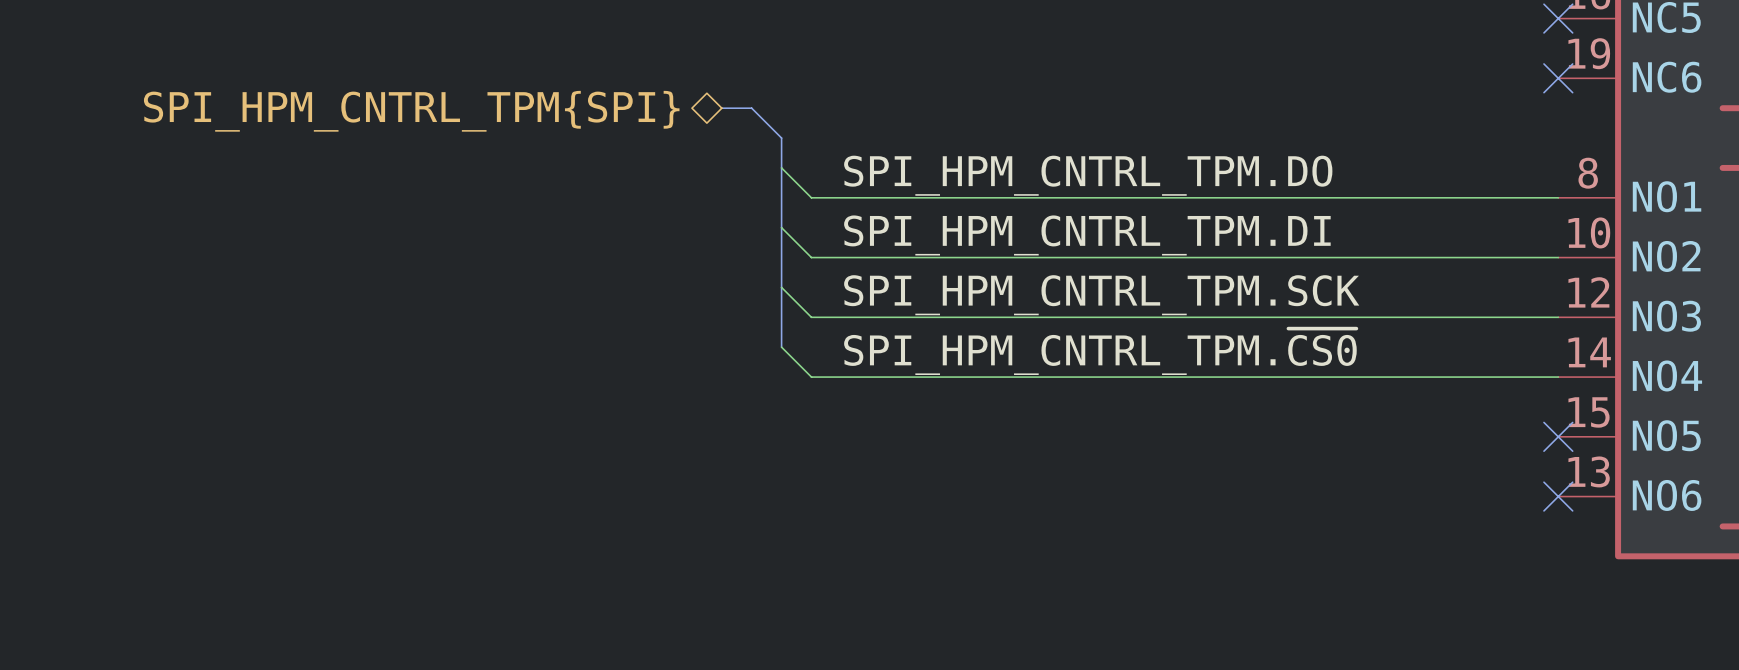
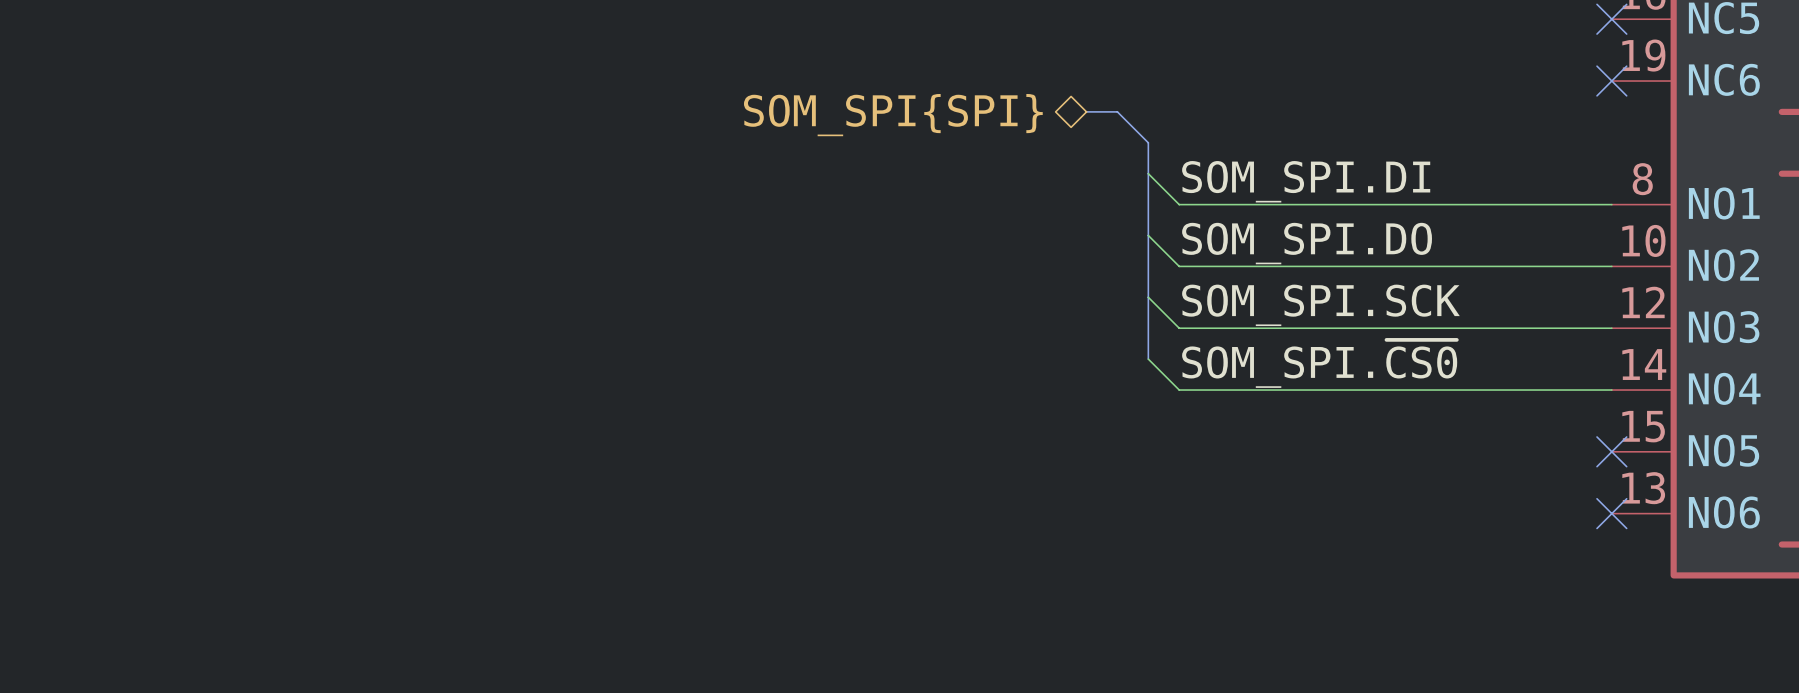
bus: (721, 108) (751, 108) (781, 138) (781, 347) -> (1086, 111) (1117, 111) (1148, 142) (1148, 359)
hierarchical label: SPI_HPM_CNTRL_TPM{SPI} (411, 111) -> none
hierarchical label: none -> SOM_SPI{SPI} (893, 115)
wire: (781, 167) (811, 197) (1140, 197) -> (1148, 173) (1179, 204)
label: SPI_HPM_CNTRL_TPM.DO (1088, 175) -> none
label: none -> SOM_SPI.DI (1306, 181)
wire: (781, 227) (811, 257) (1140, 257) -> (1148, 235) (1179, 266)
label: SPI_HPM_CNTRL_TPM.DI (1087, 235) -> none
label: none -> SOM_SPI.DO (1307, 243)
wire: (781, 287) (811, 317) (1140, 317) -> (1148, 297) (1179, 328)
label: SPI_HPM_CNTRL_TPM.SCK (1101, 295) -> none
label: none -> SOM_SPI.SCK (1320, 305)
wire: (781, 347) (811, 377) (1140, 377) -> (1148, 359) (1179, 390)
label: SPI_HPM_CNTRL_TPM.~{CS0} (1100, 351) -> none
label: none -> SOM_SPI.~{CS0} (1319, 363)

